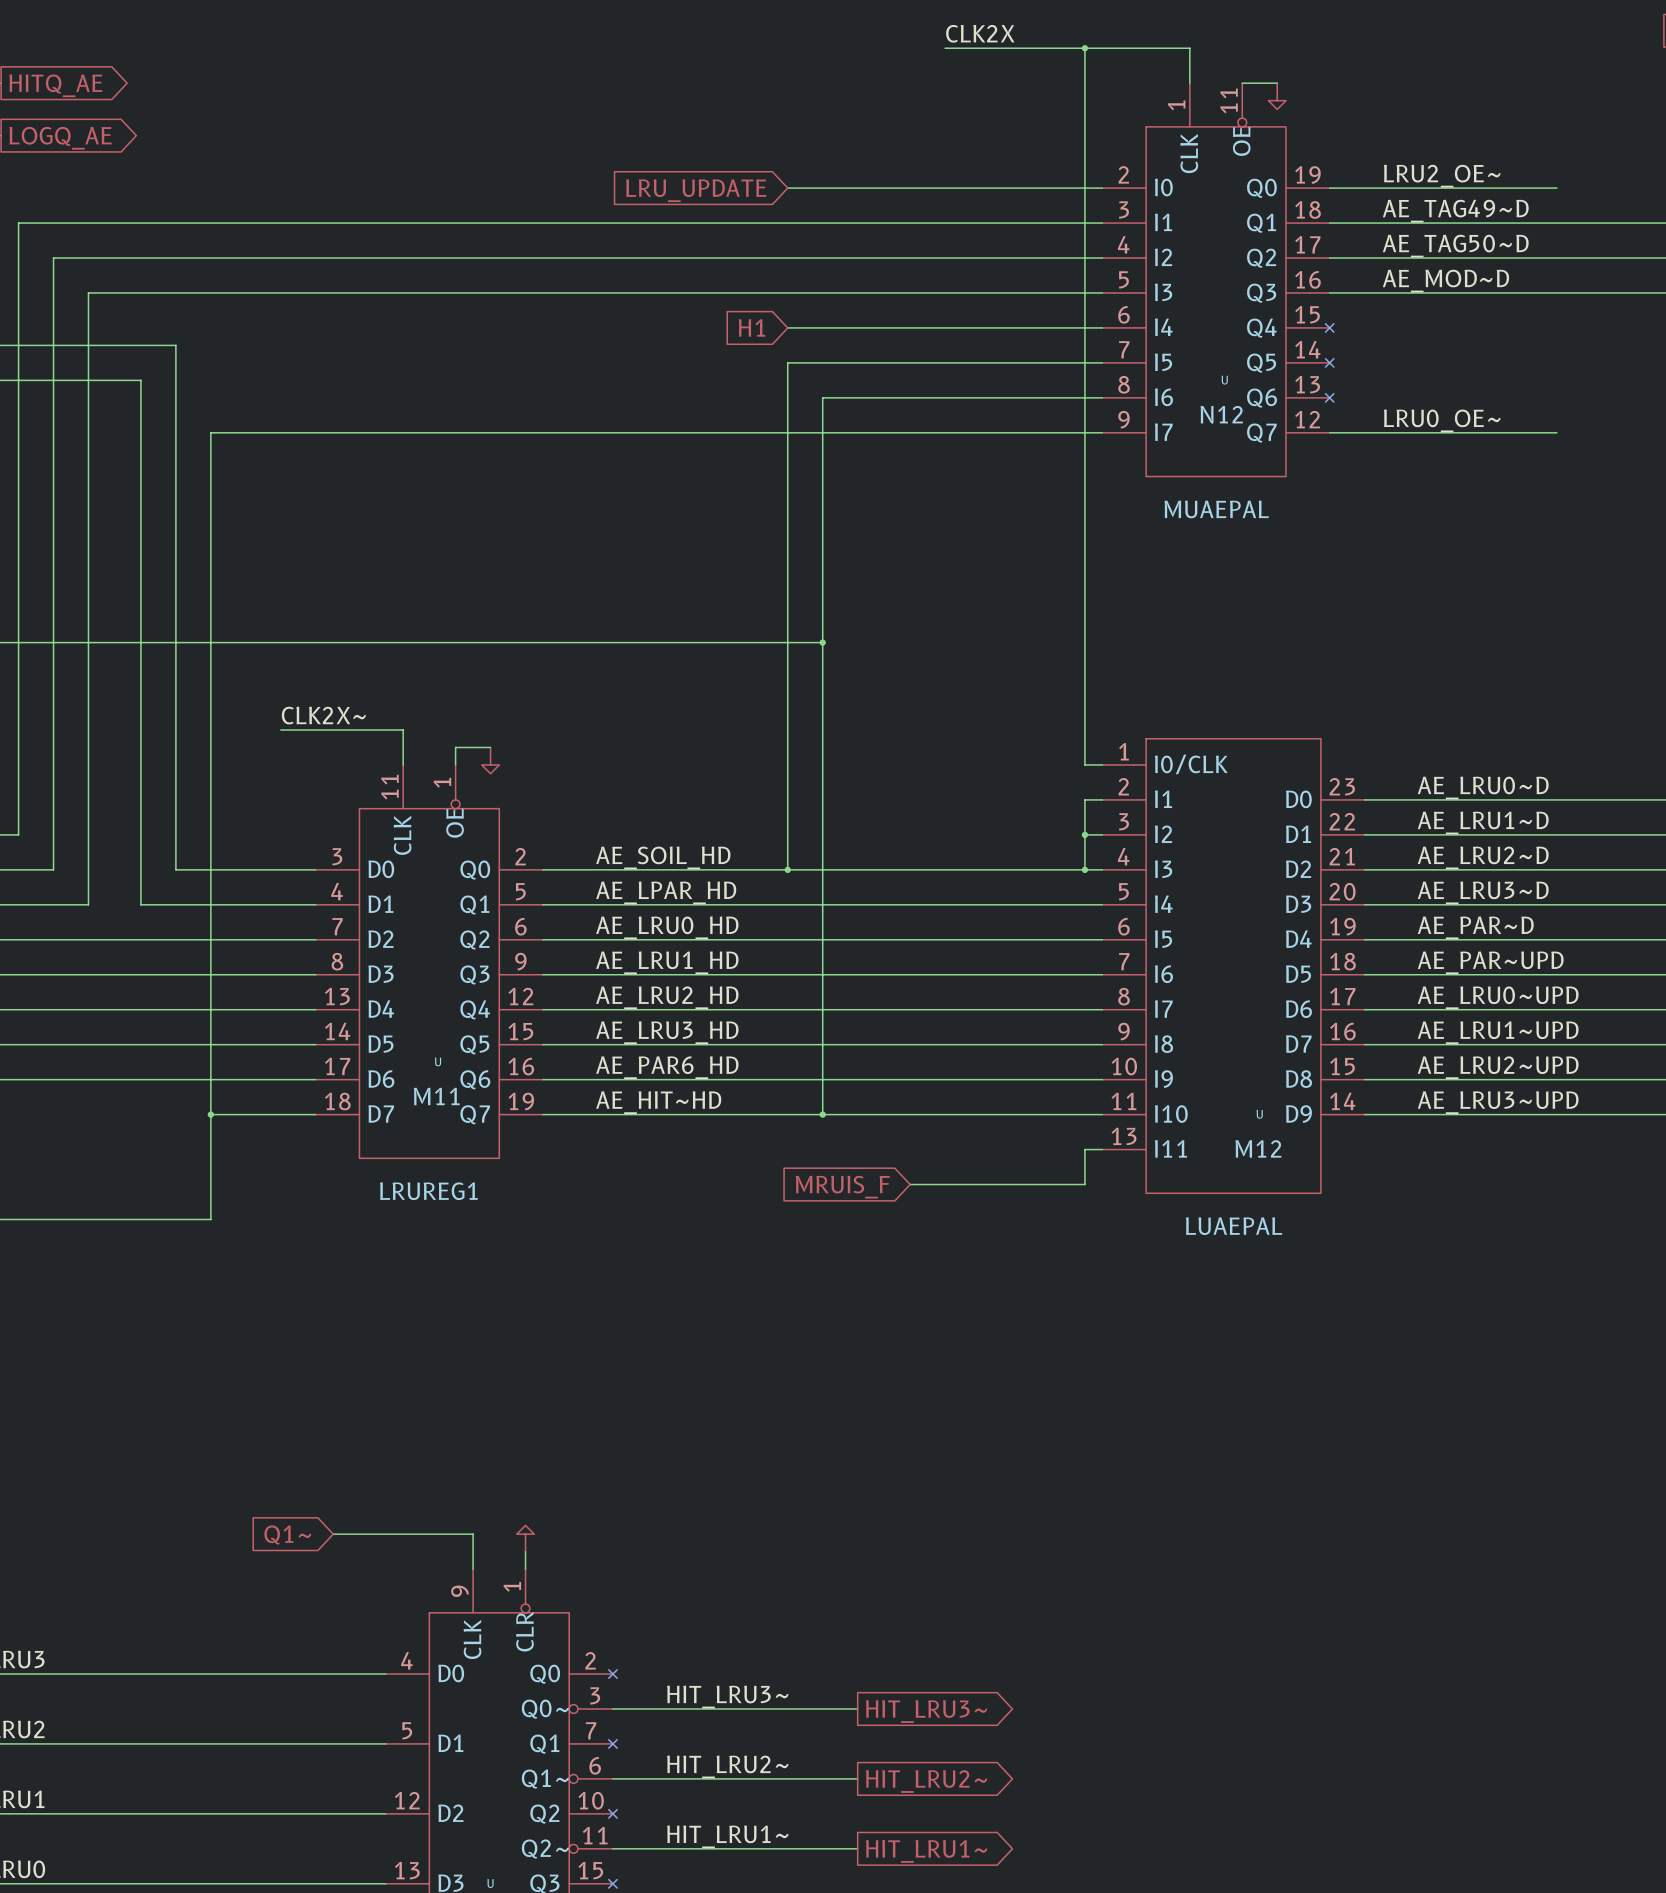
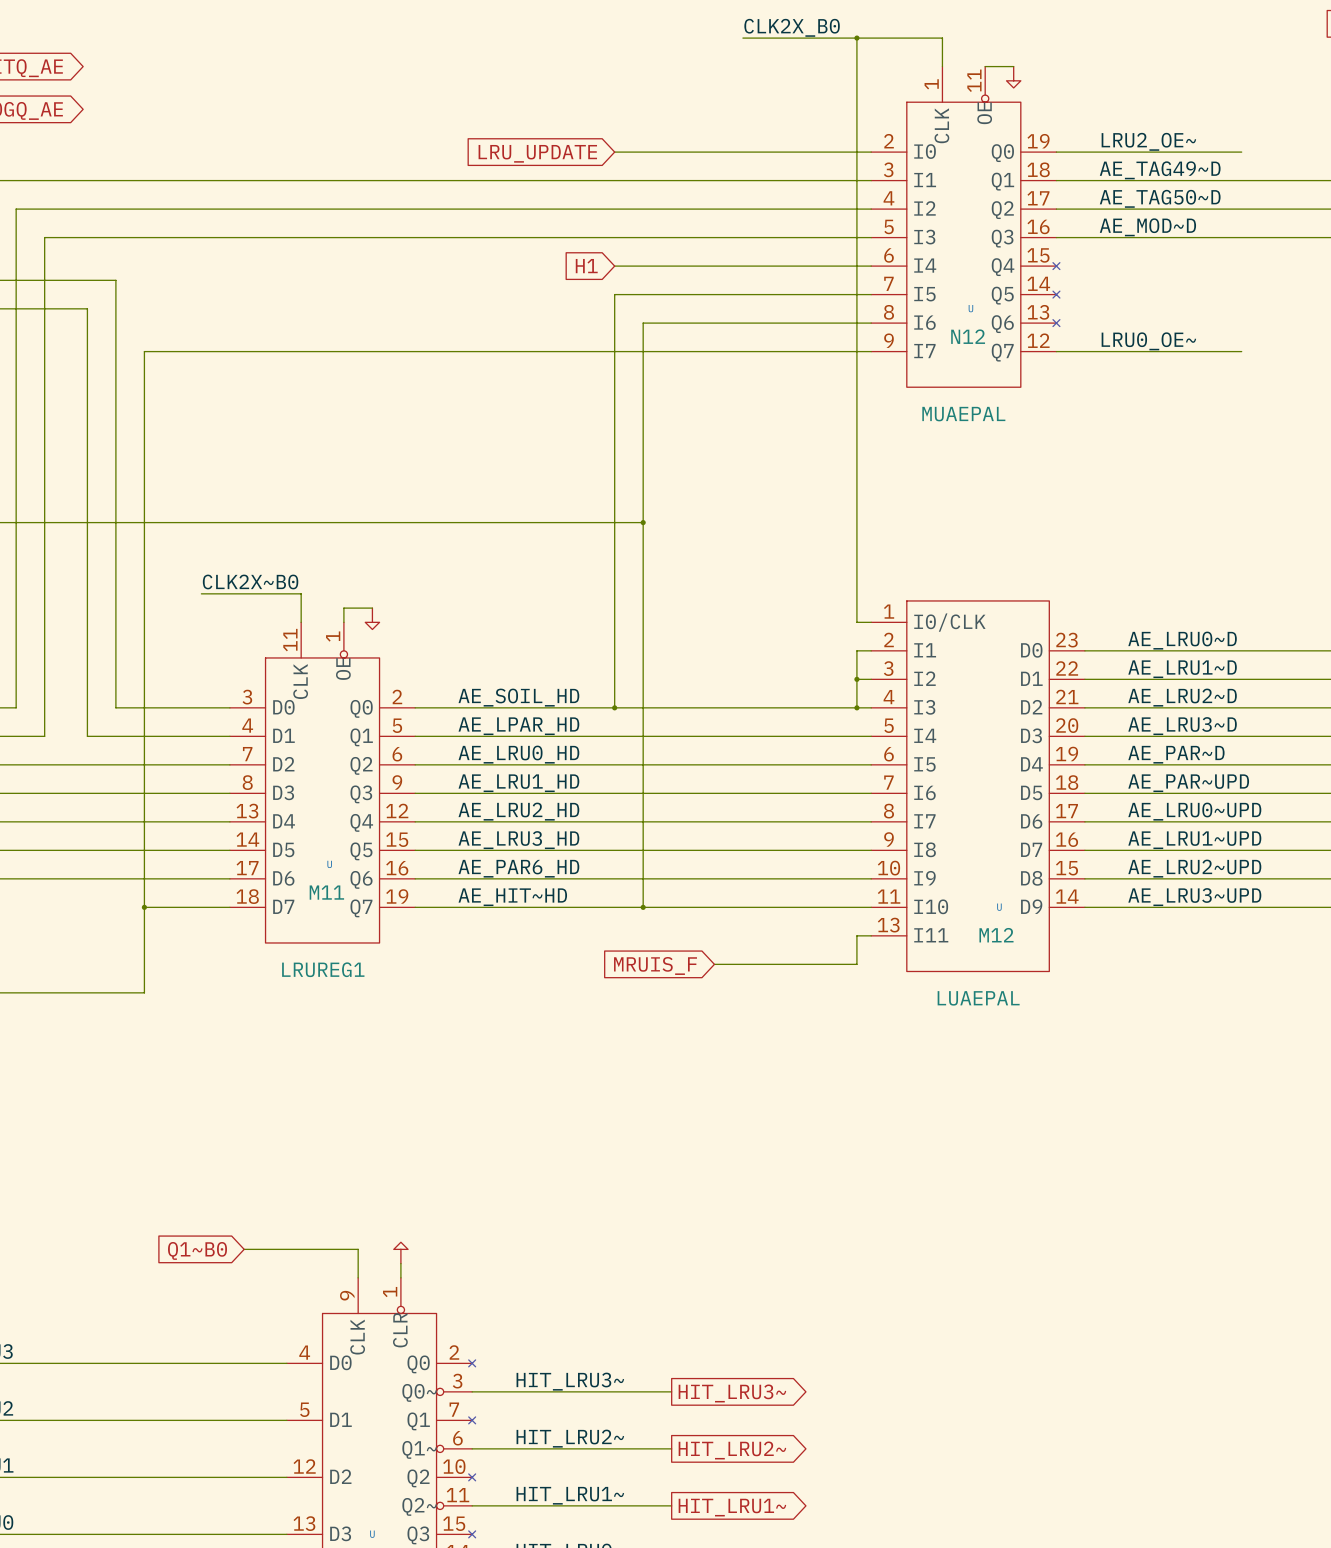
label: CLK2X (980, 33) -> CLK2X_B0 (792, 27)
label: CLK2X~ (323, 715) -> CLK2X~B0 (250, 581)
global label: Q1~ (287, 1534) -> Q1~B0 (197, 1250)

